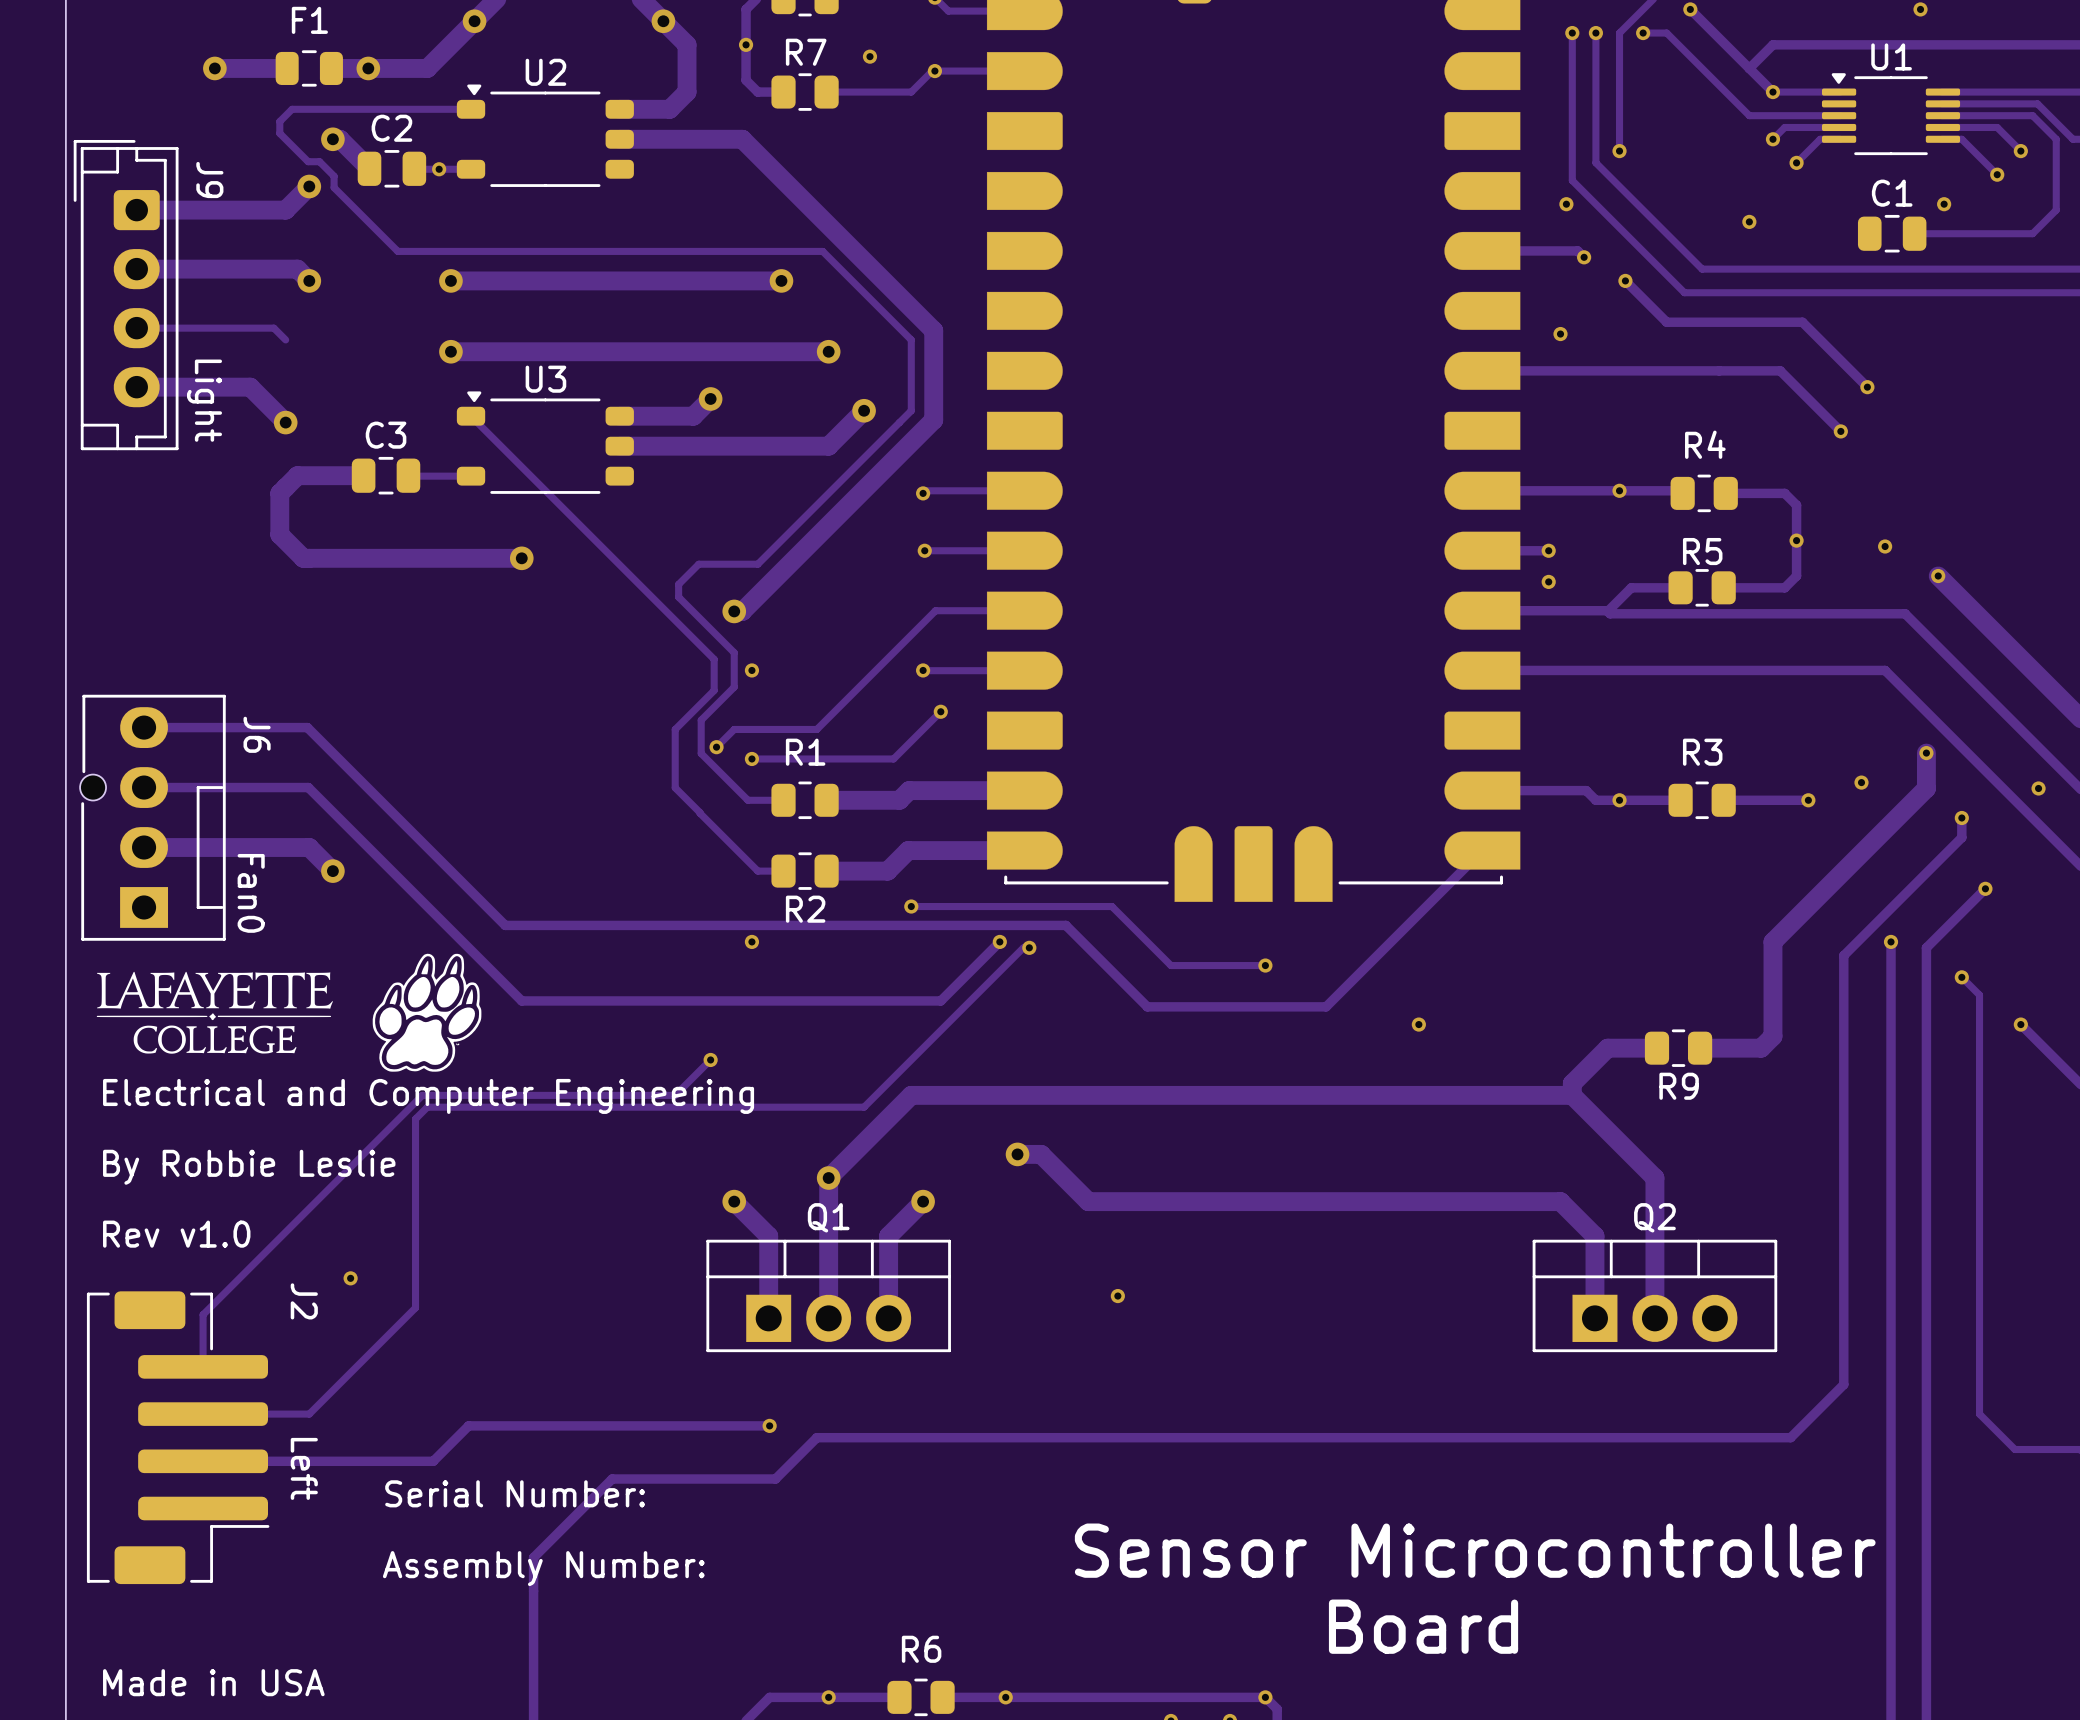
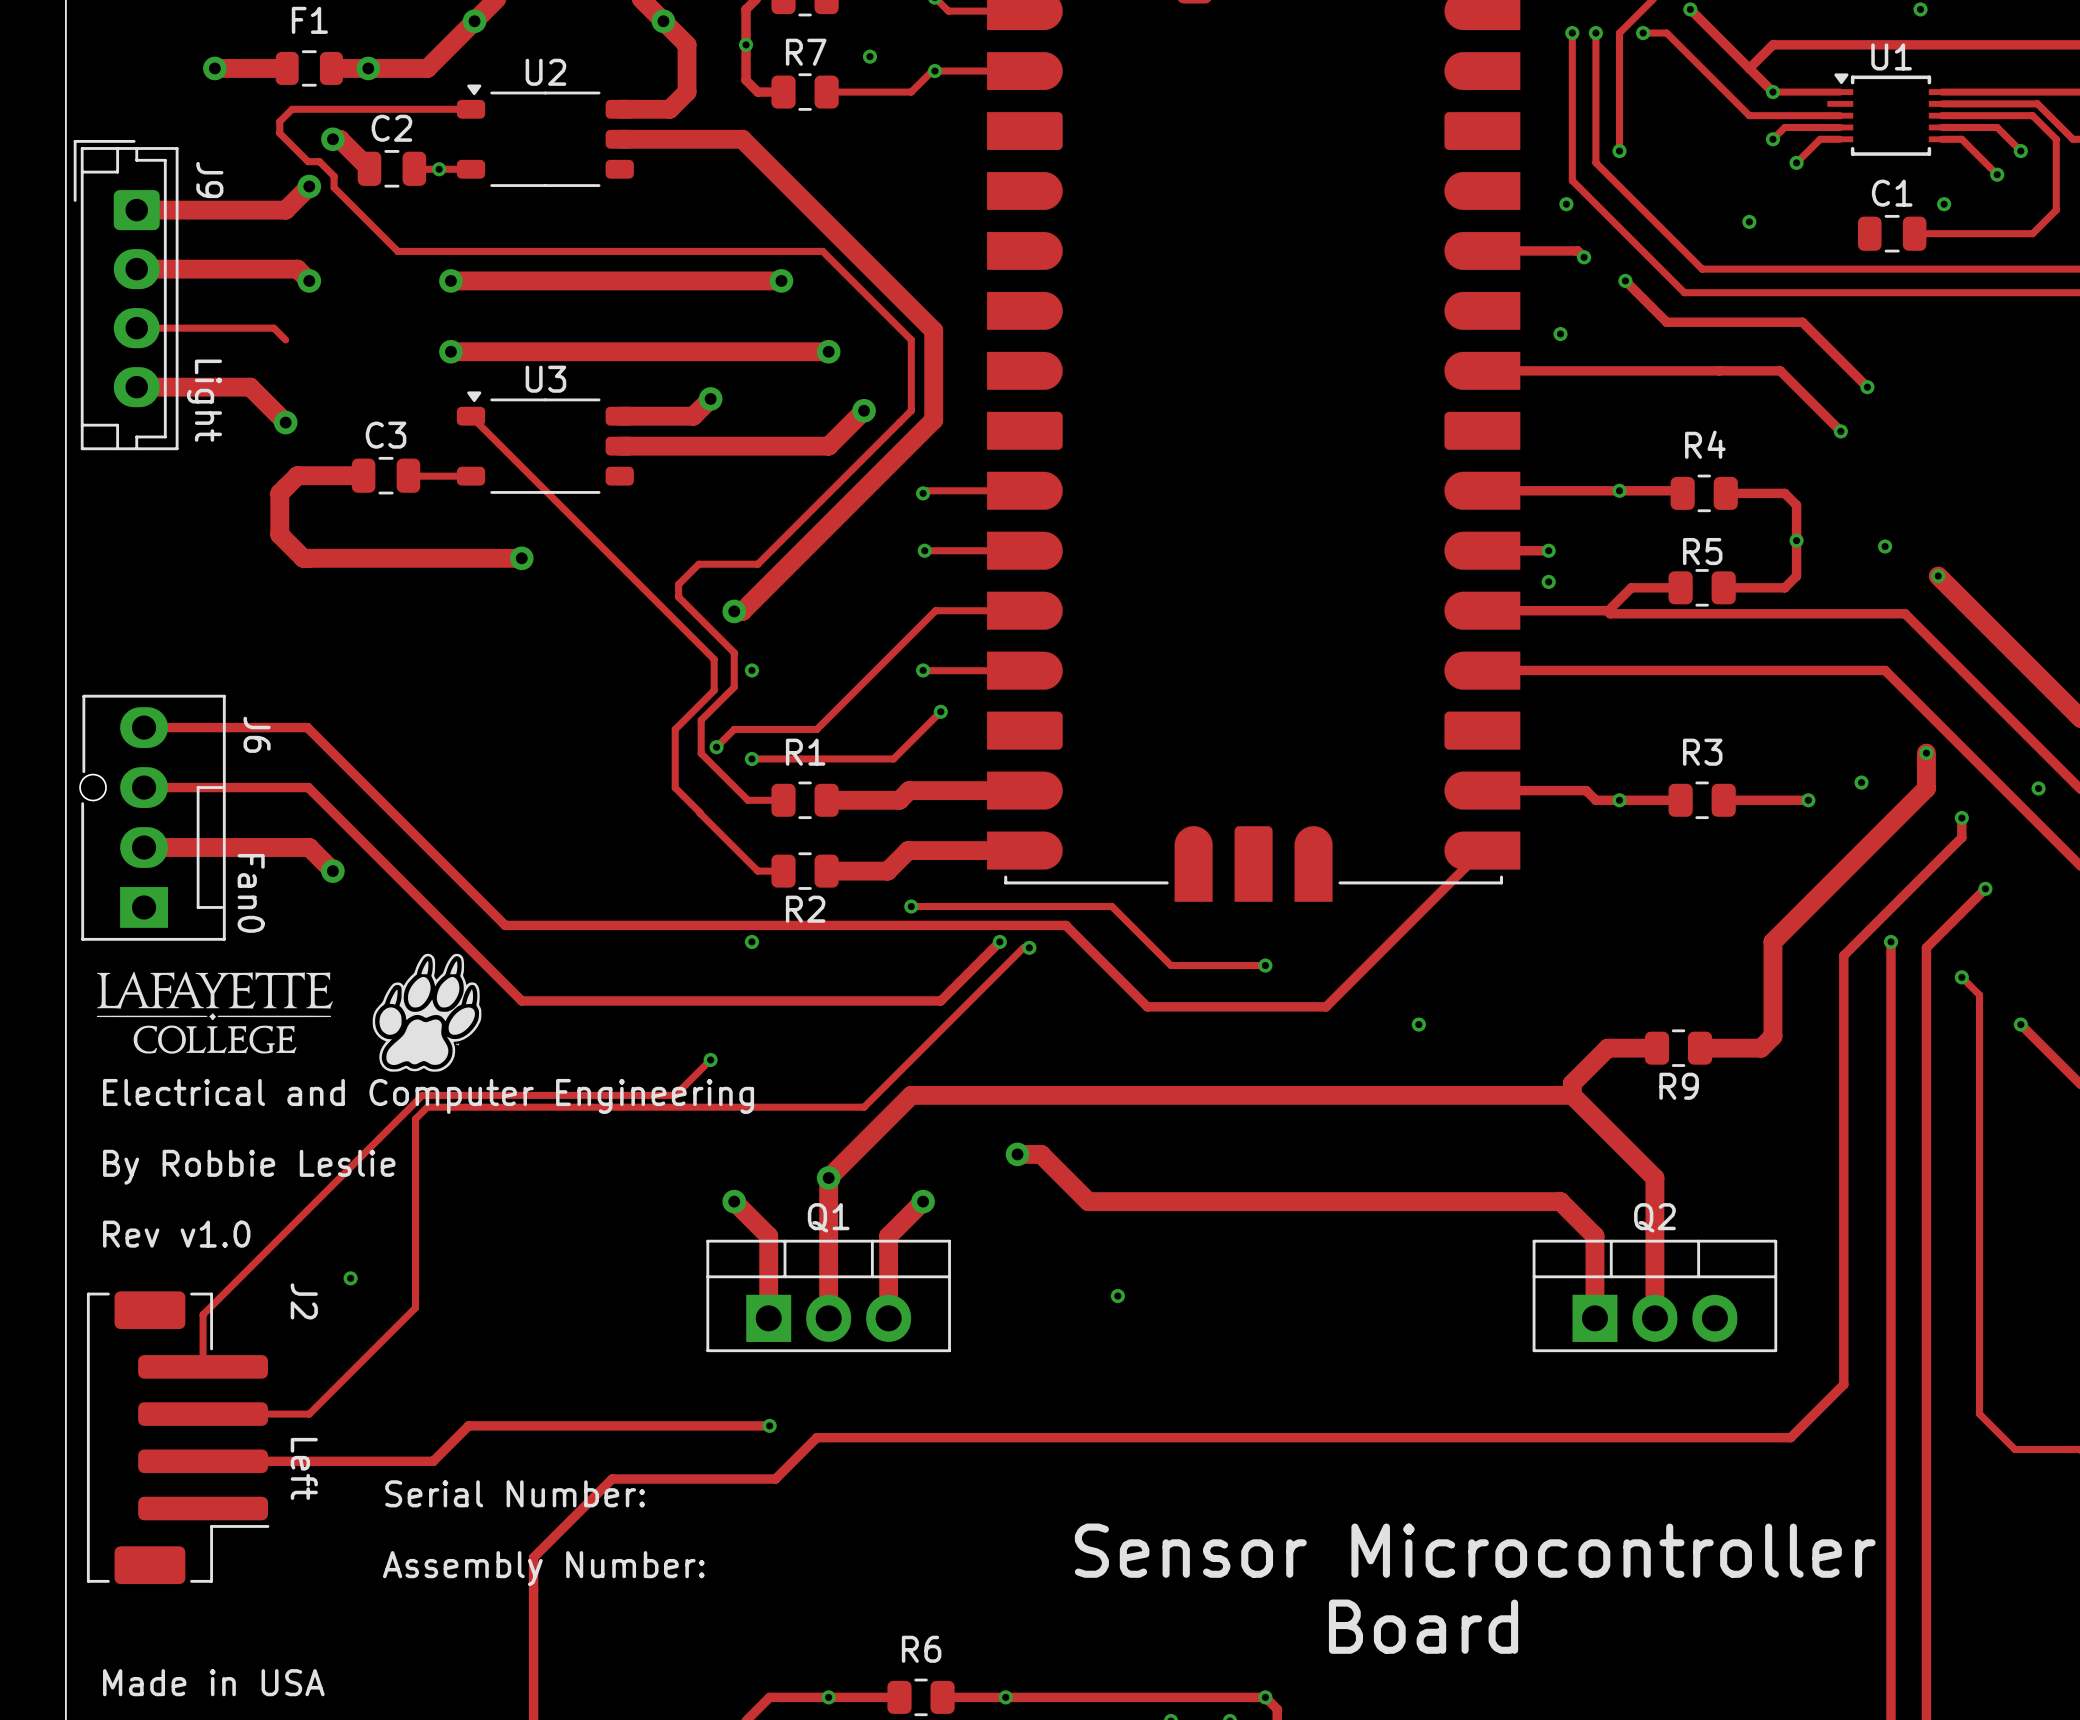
U1 footprint: [1821, 73, 1961, 156] -> [1827, 73, 1955, 156]

